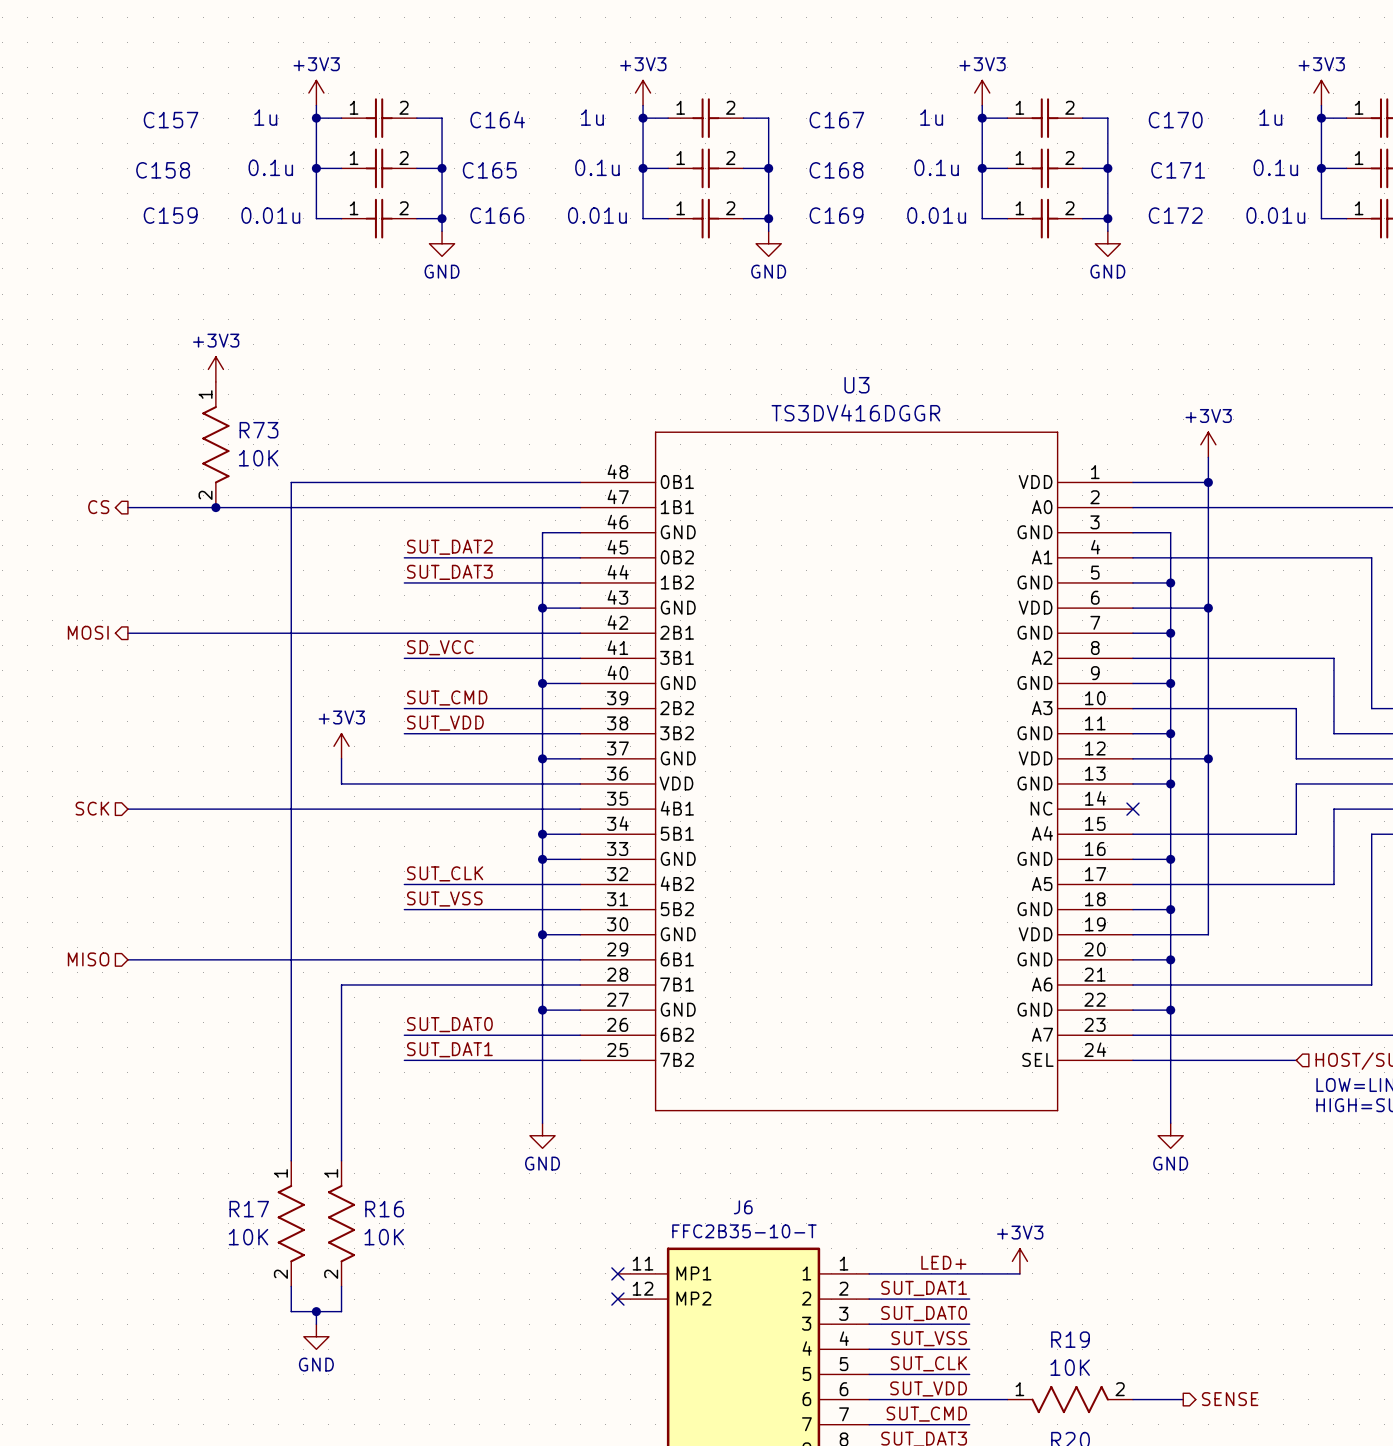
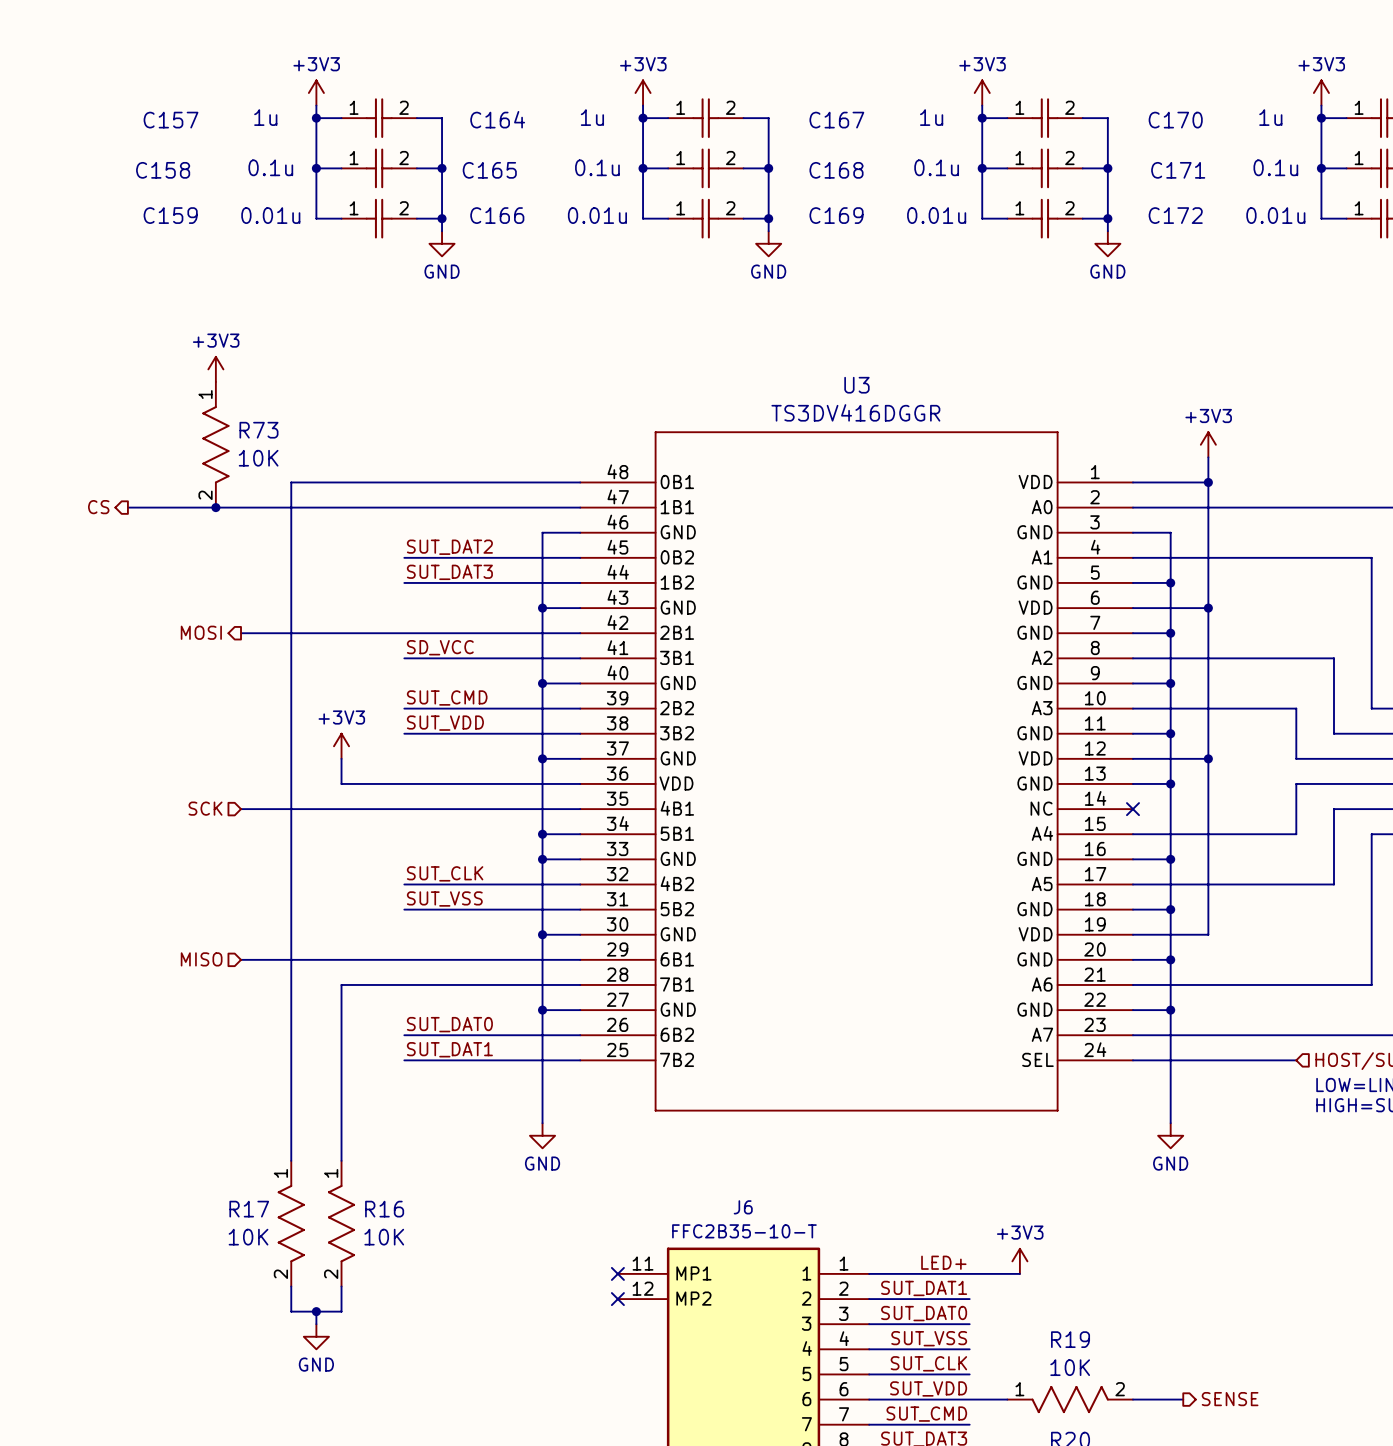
hierarchical label position: MOSI (88, 632) -> MOSI (201, 632)
wire: (127, 633) (241, 633) -> none
hierarchical label position: SCK (92, 808) -> SCK (205, 808)
wire: (127, 809) (241, 809) -> none
hierarchical label position: MISO (88, 959) -> MISO (201, 959)
wire: (127, 959) (241, 959) -> none

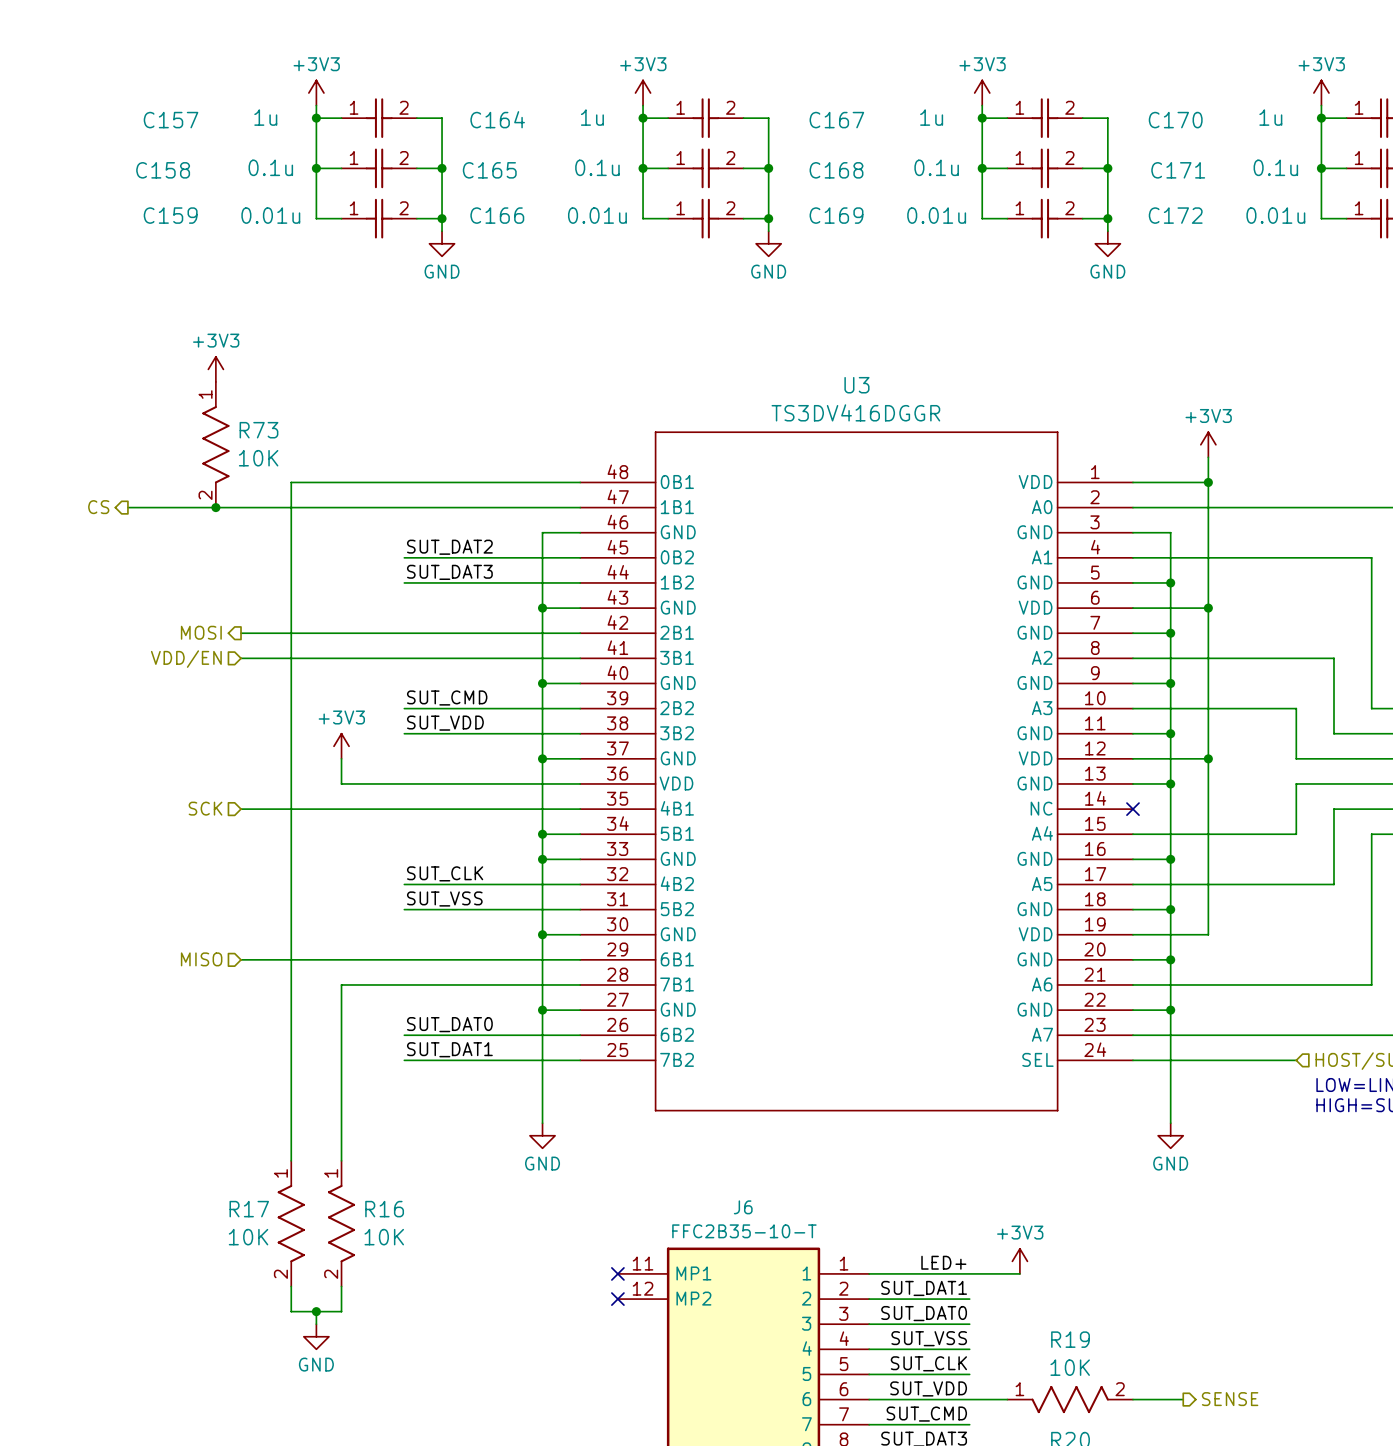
label: SD_VCC (440, 647) -> none
wire: none -> (241, 658) (404, 658)
hierarchical label: none -> VDD/EN (186, 659)

